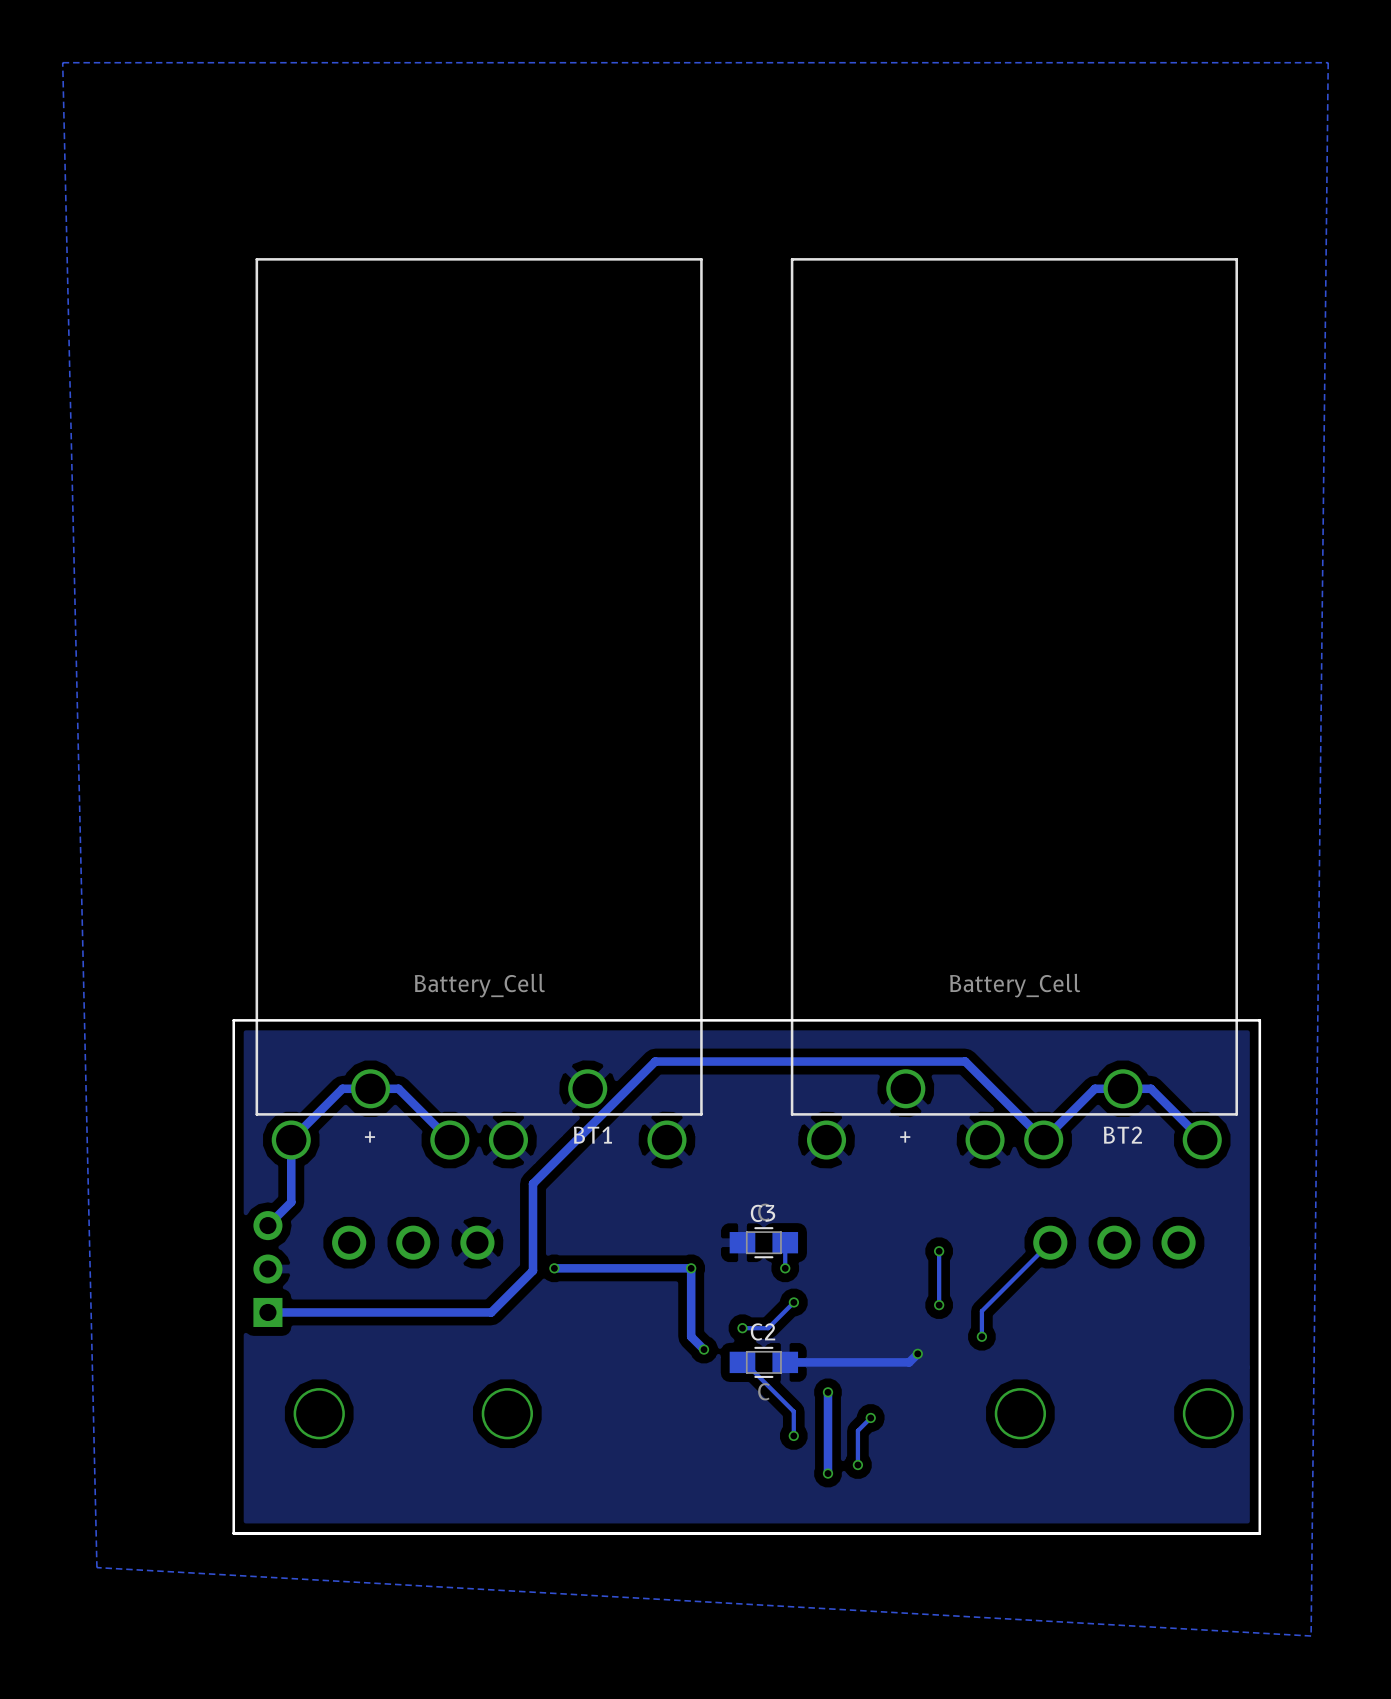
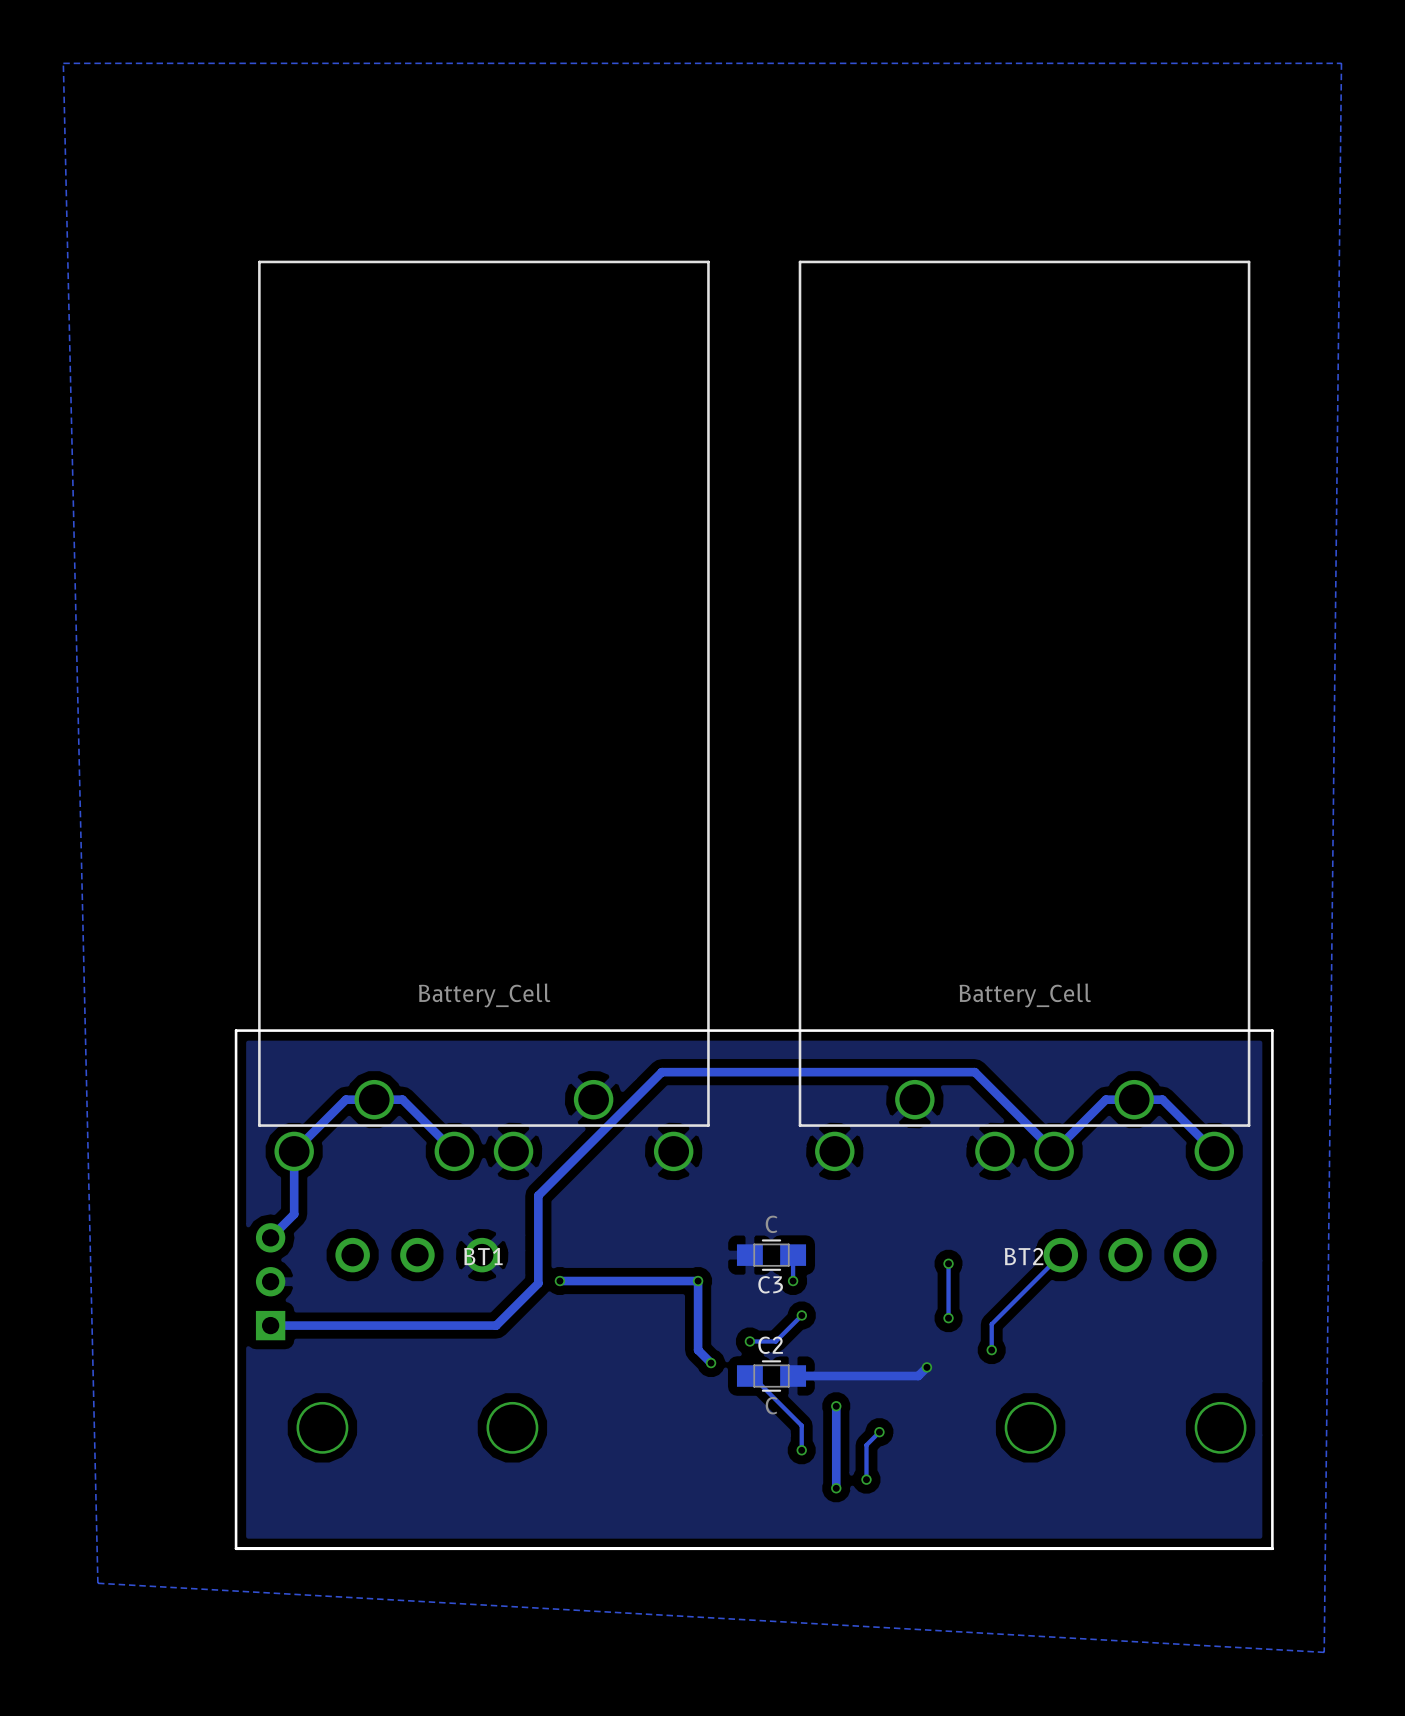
BT1 name position: BT1 (592, 1135) -> BT1 (483, 1256)
BT2 name position: BT2 (1122, 1135) -> BT2 (1024, 1256)
BT1 text: + (369, 1137) -> none
BT2 text: + (905, 1137) -> none
C3 name position: C3 (763, 1213) -> C3 (770, 1284)

